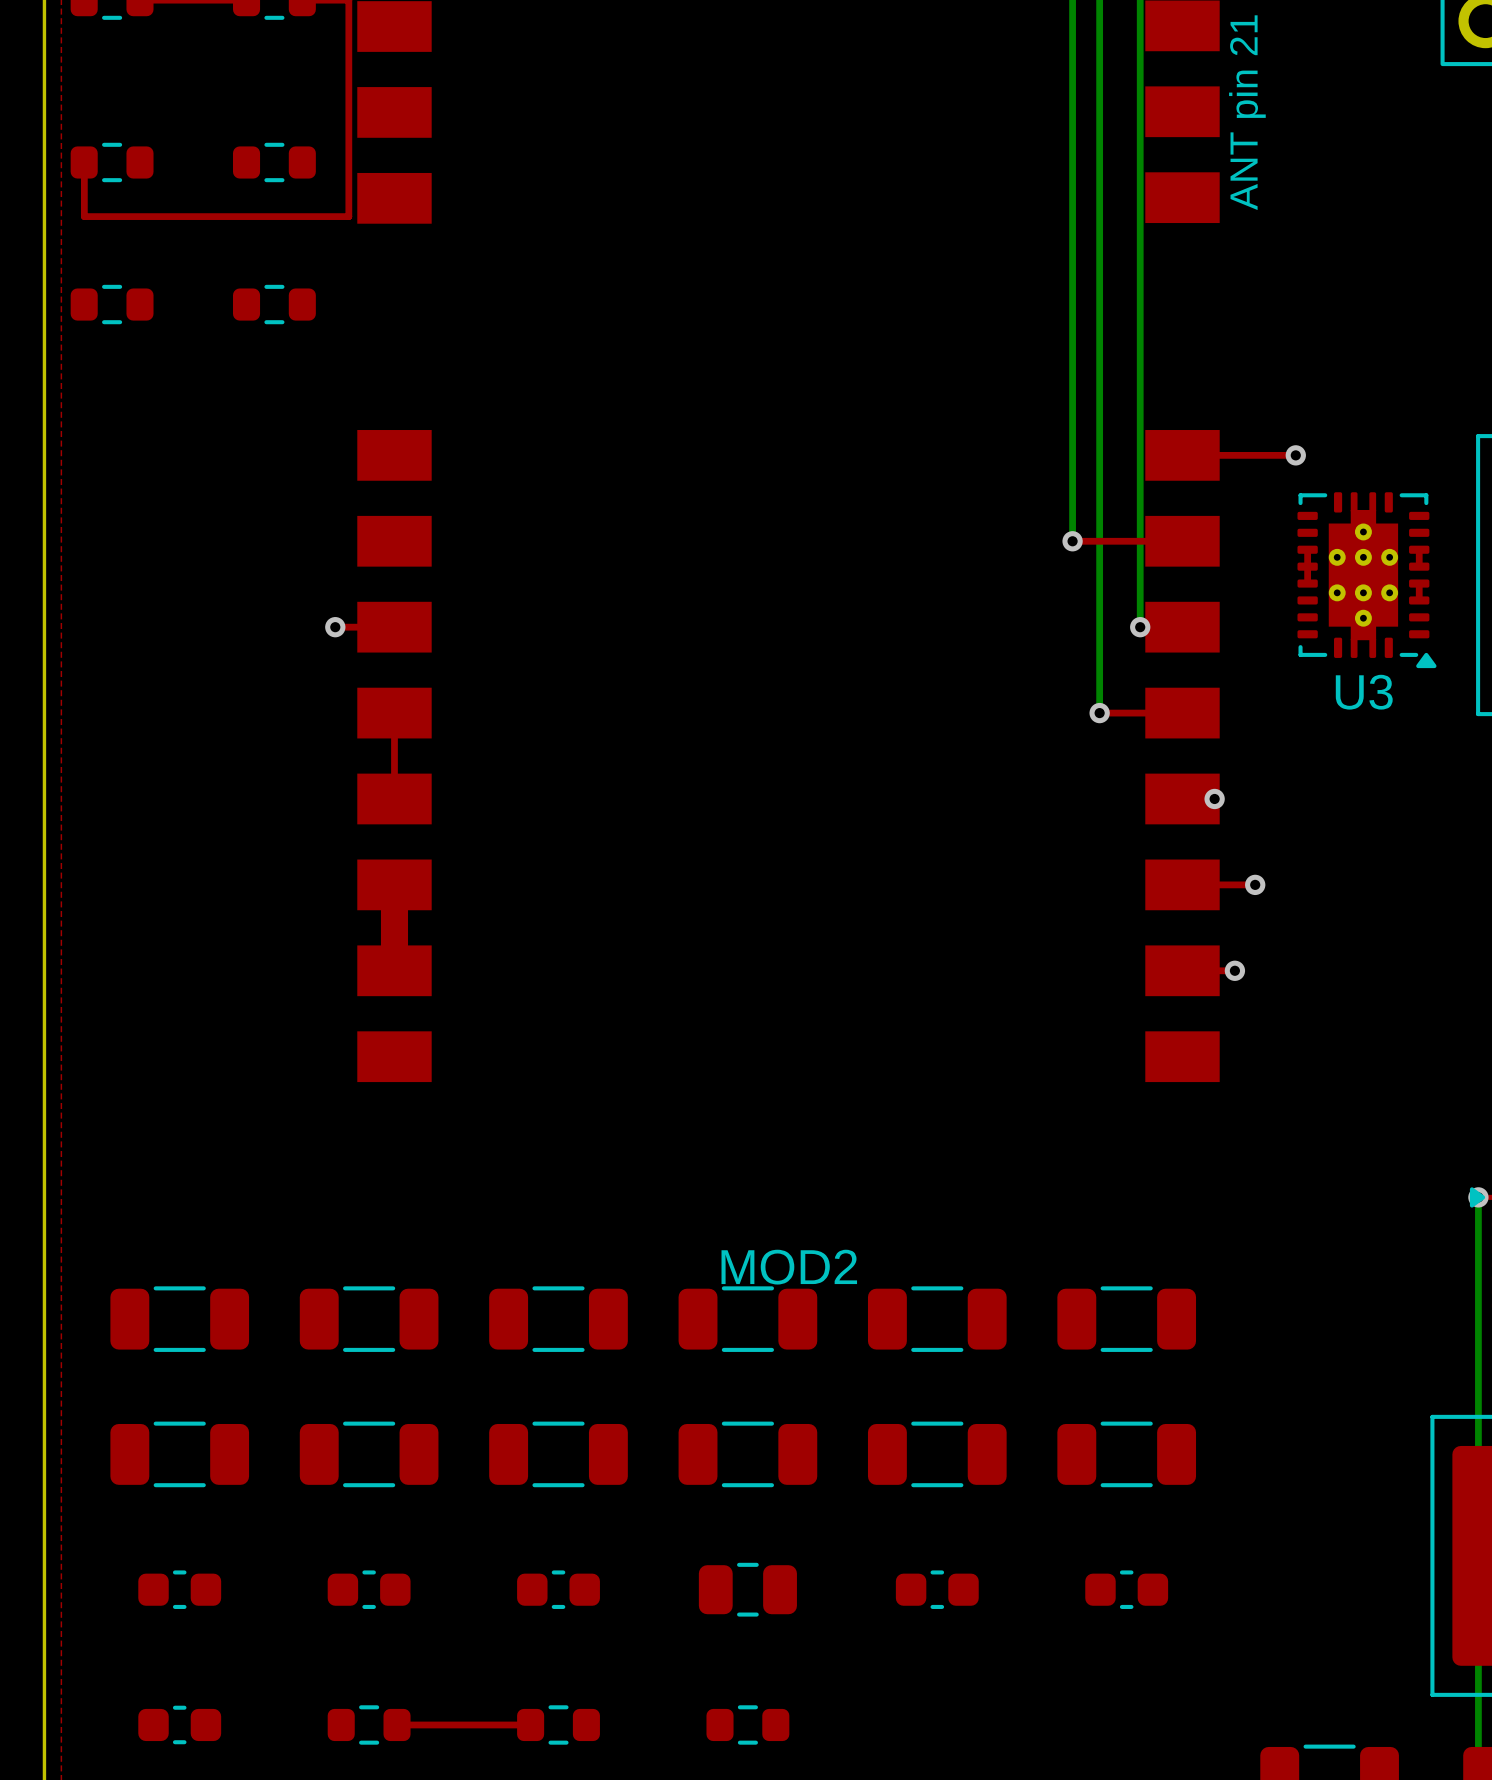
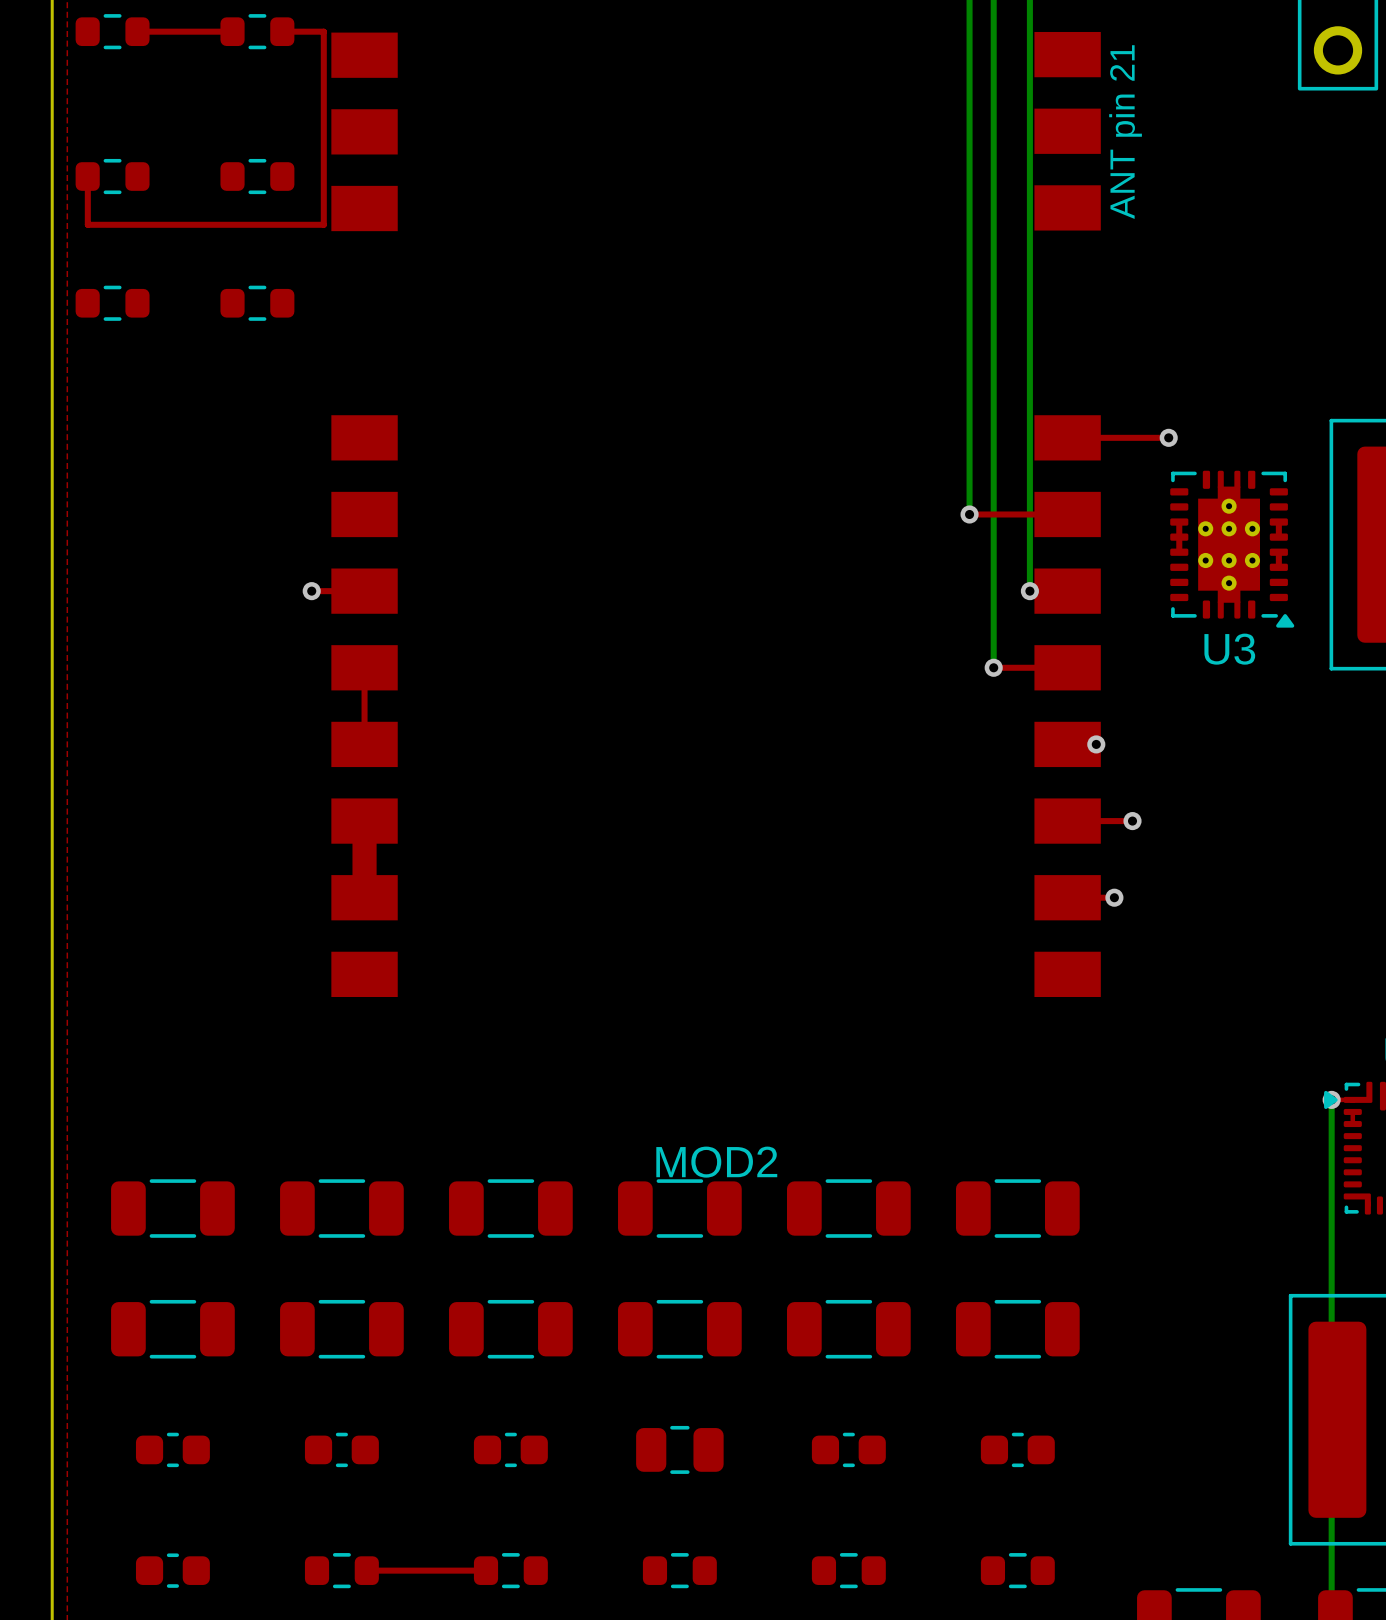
part: none -> (848, 1570)
part: none -> (1017, 1570)

